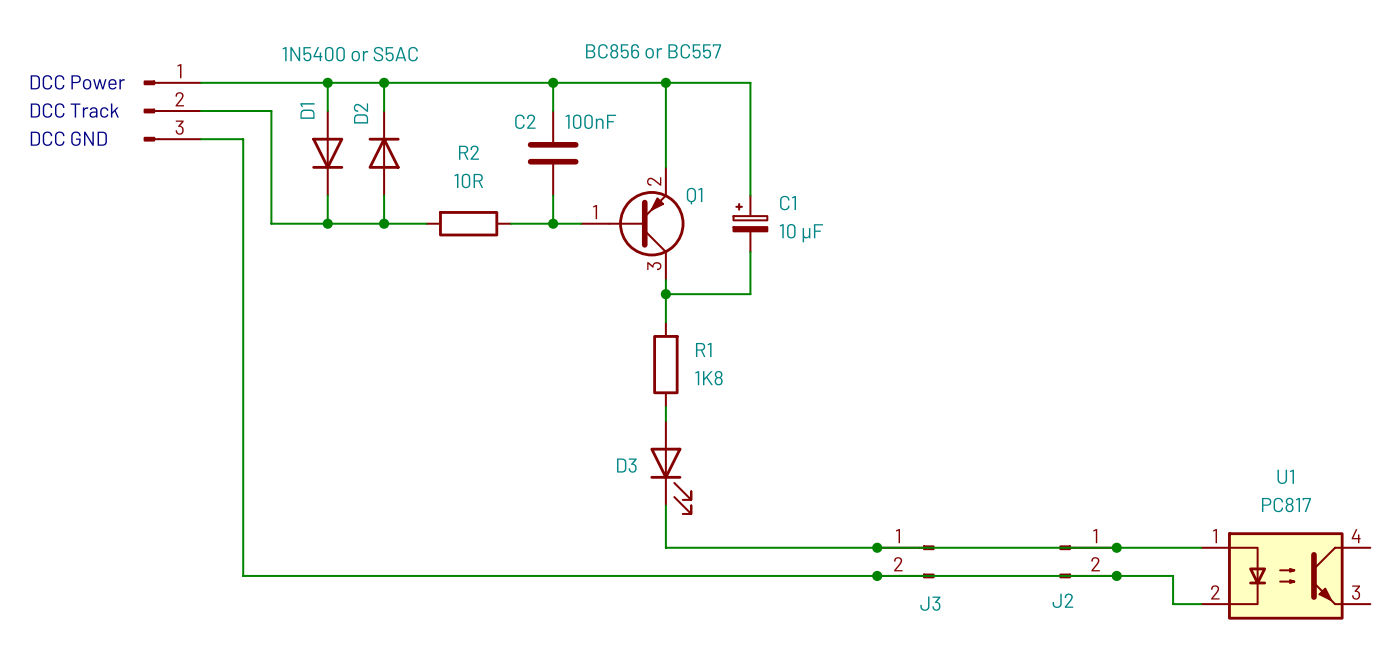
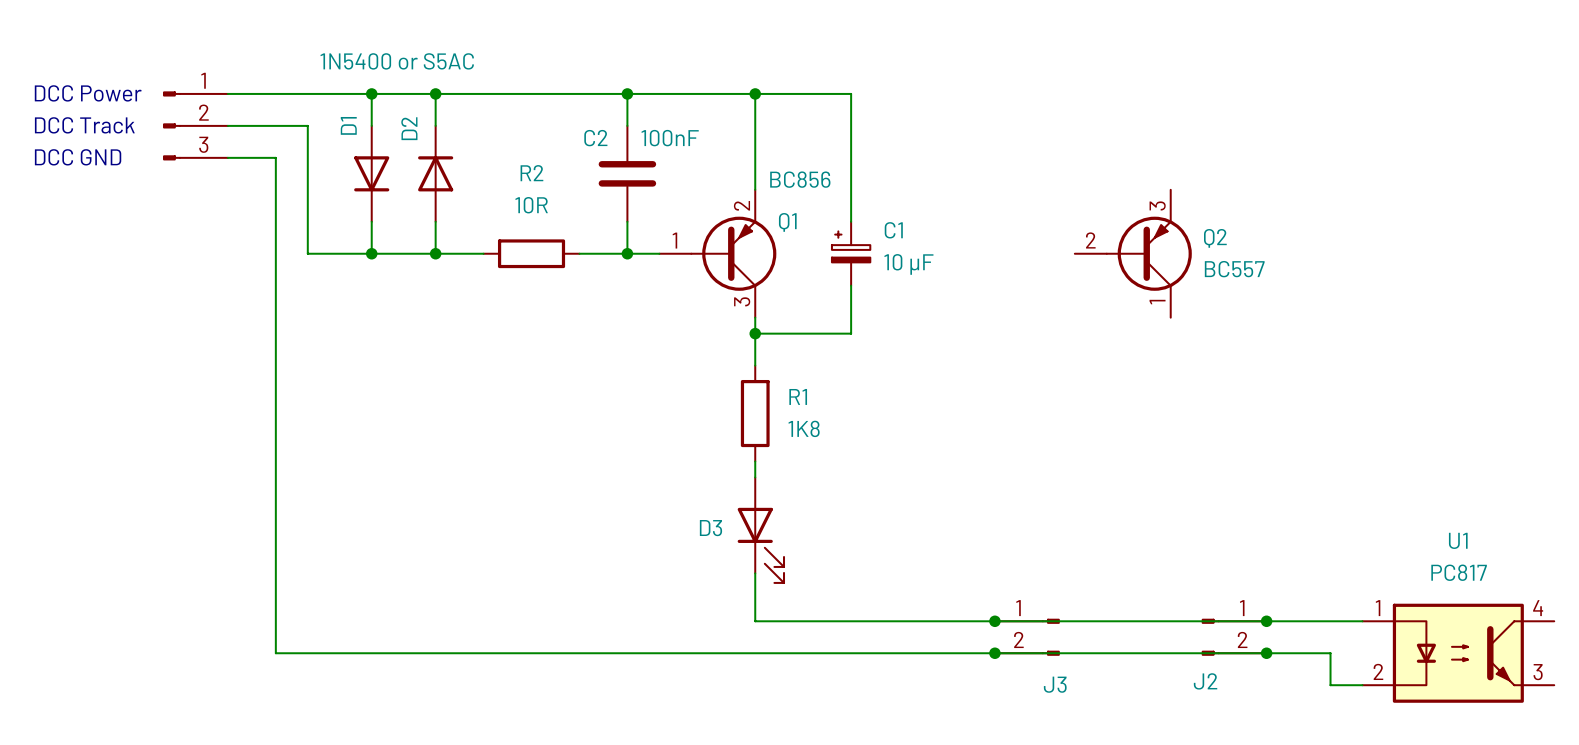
Q1 value: BC856 or BC557 (653, 51) -> BC856 (800, 179)
Q2: none -> BC557 (1133, 253)

